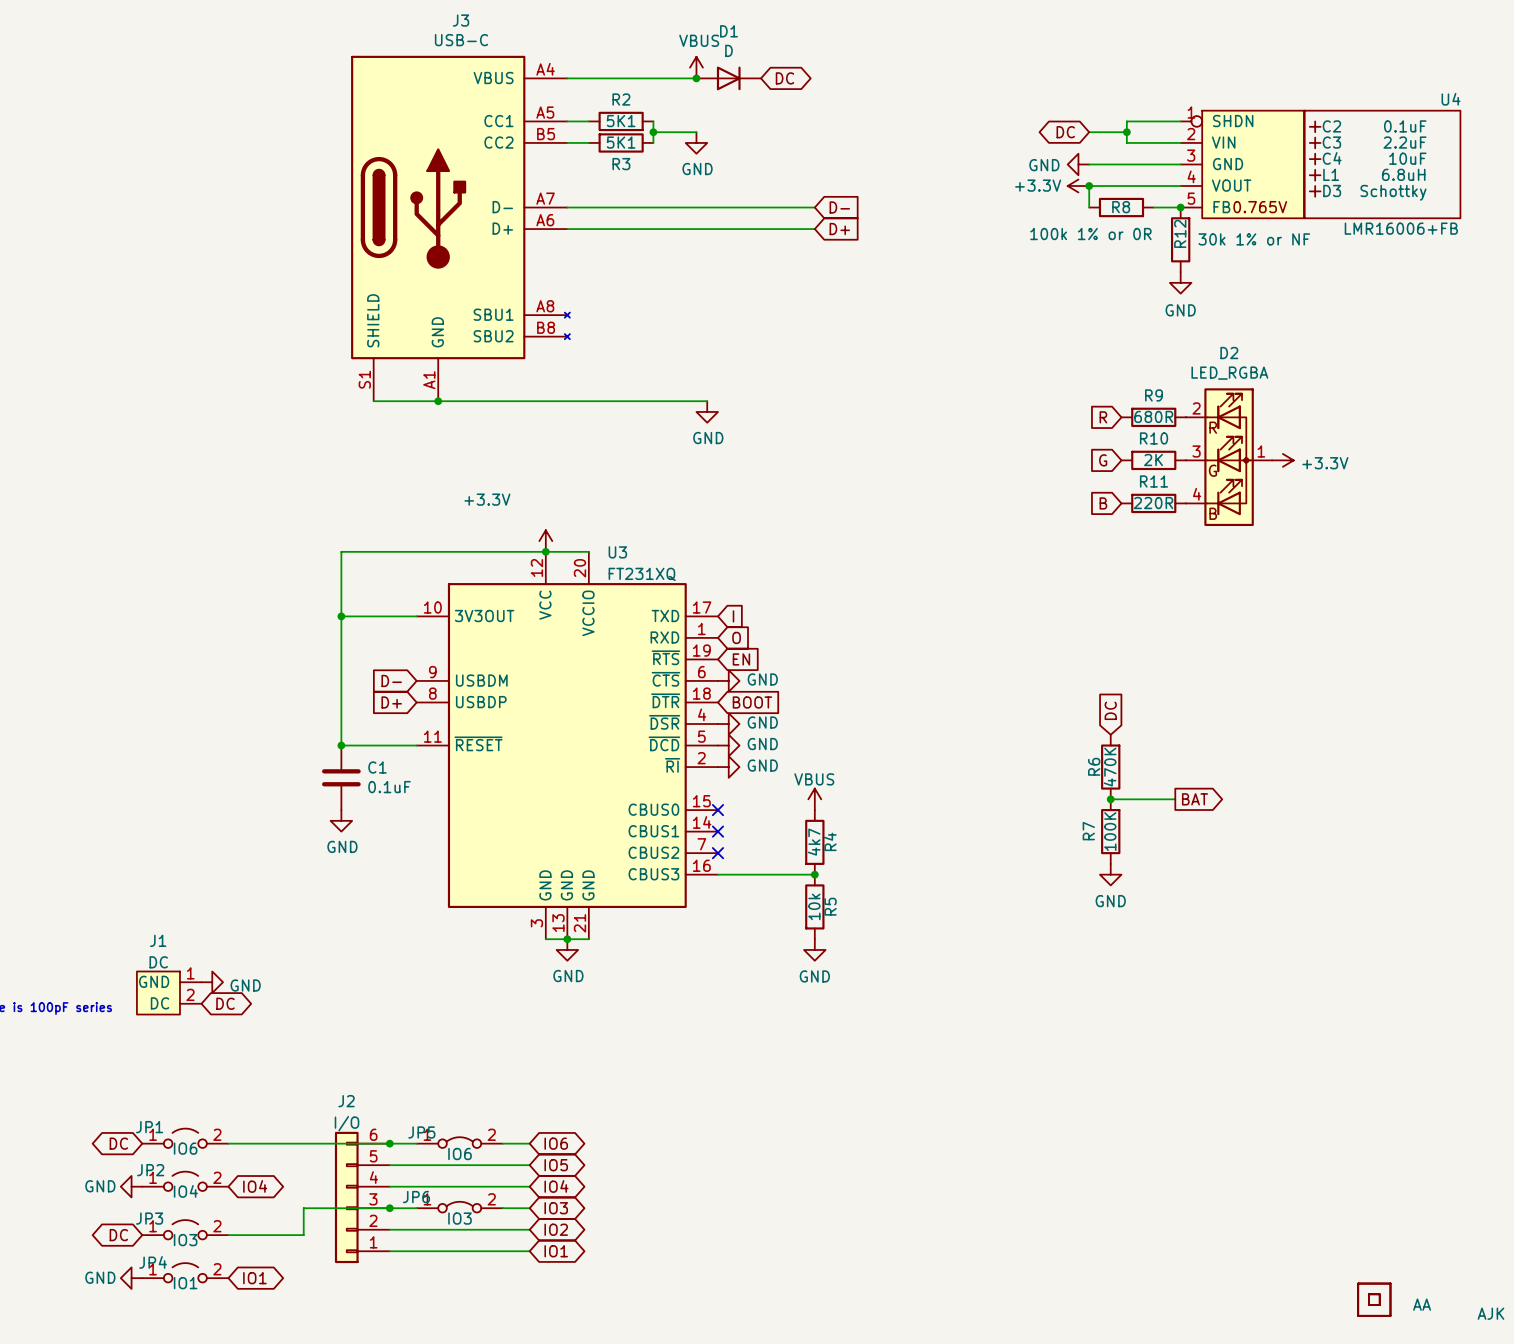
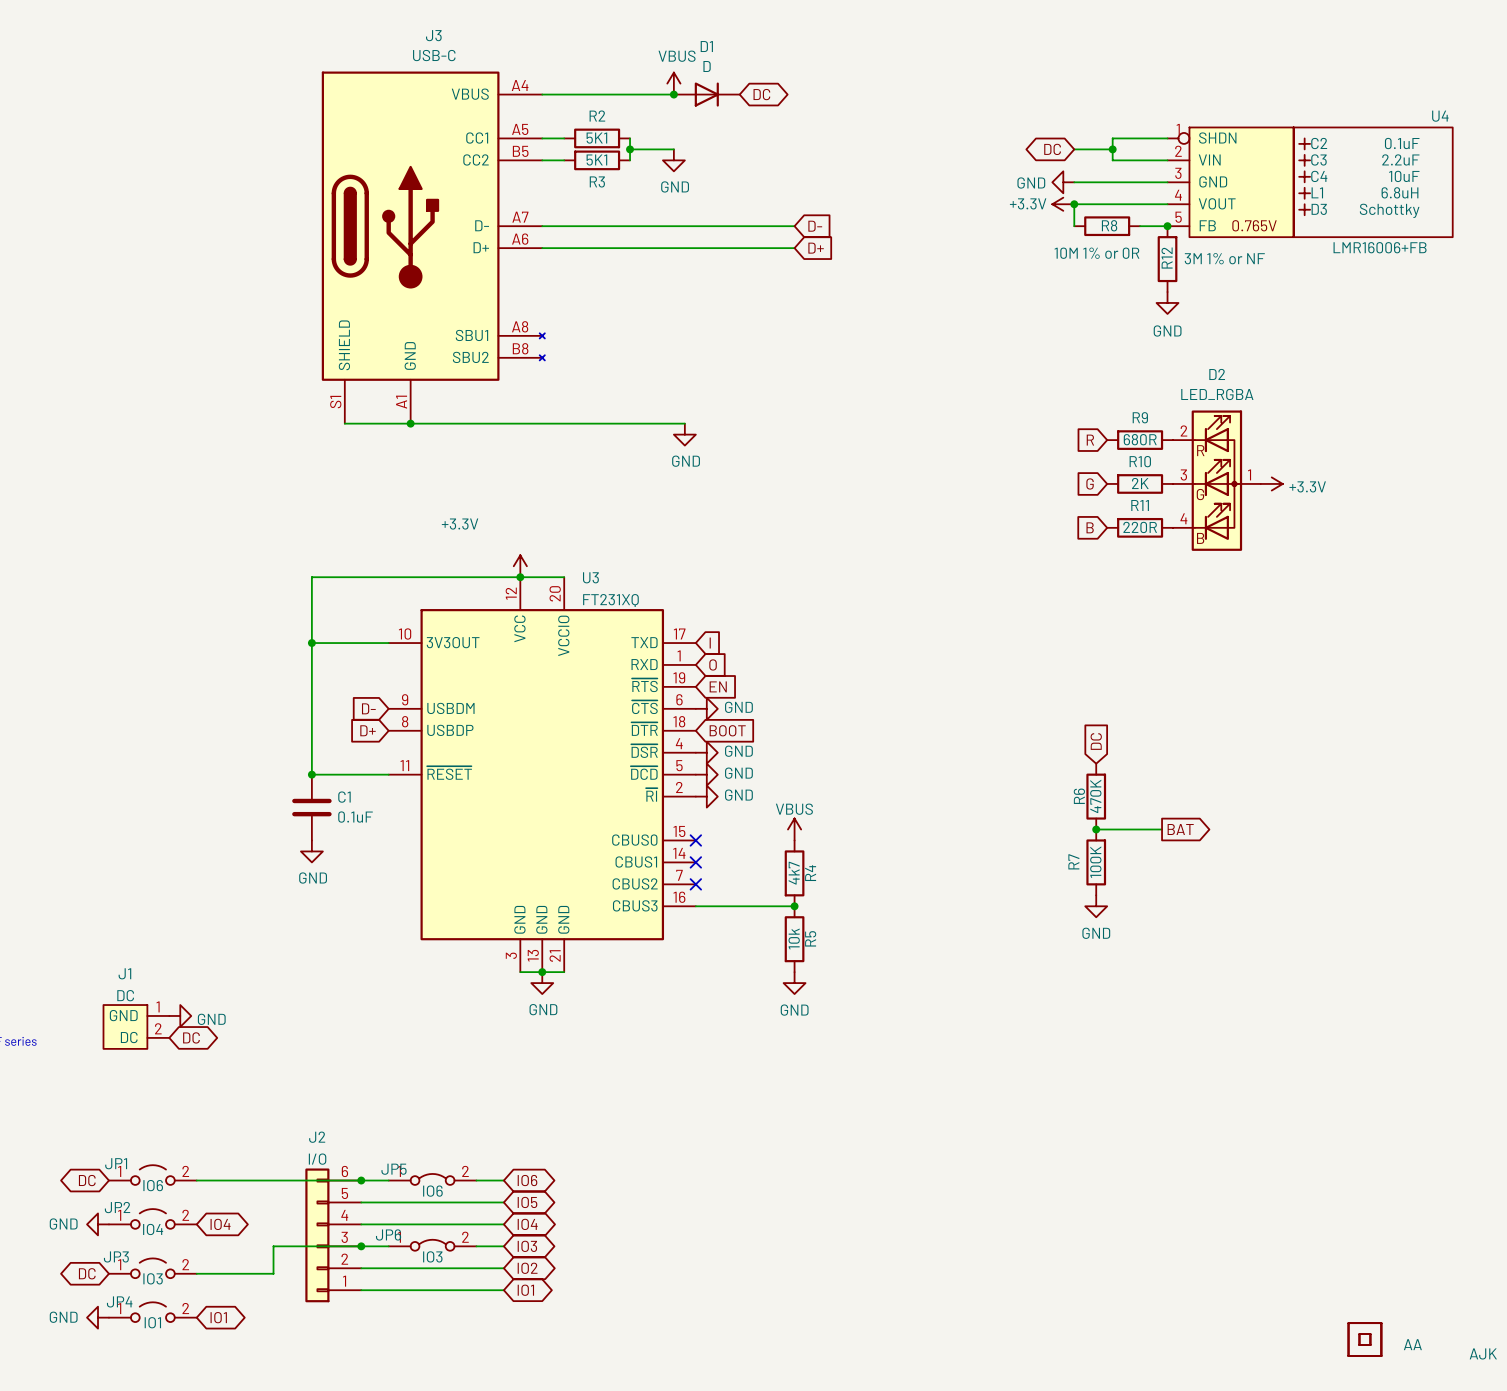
R8 value: 100k 1% or 0R (1090, 234) -> 10M 1% or 0R (1096, 253)
R12 value: 30k 1% or NF (1254, 239) -> 3M 1% or NF (1224, 258)

